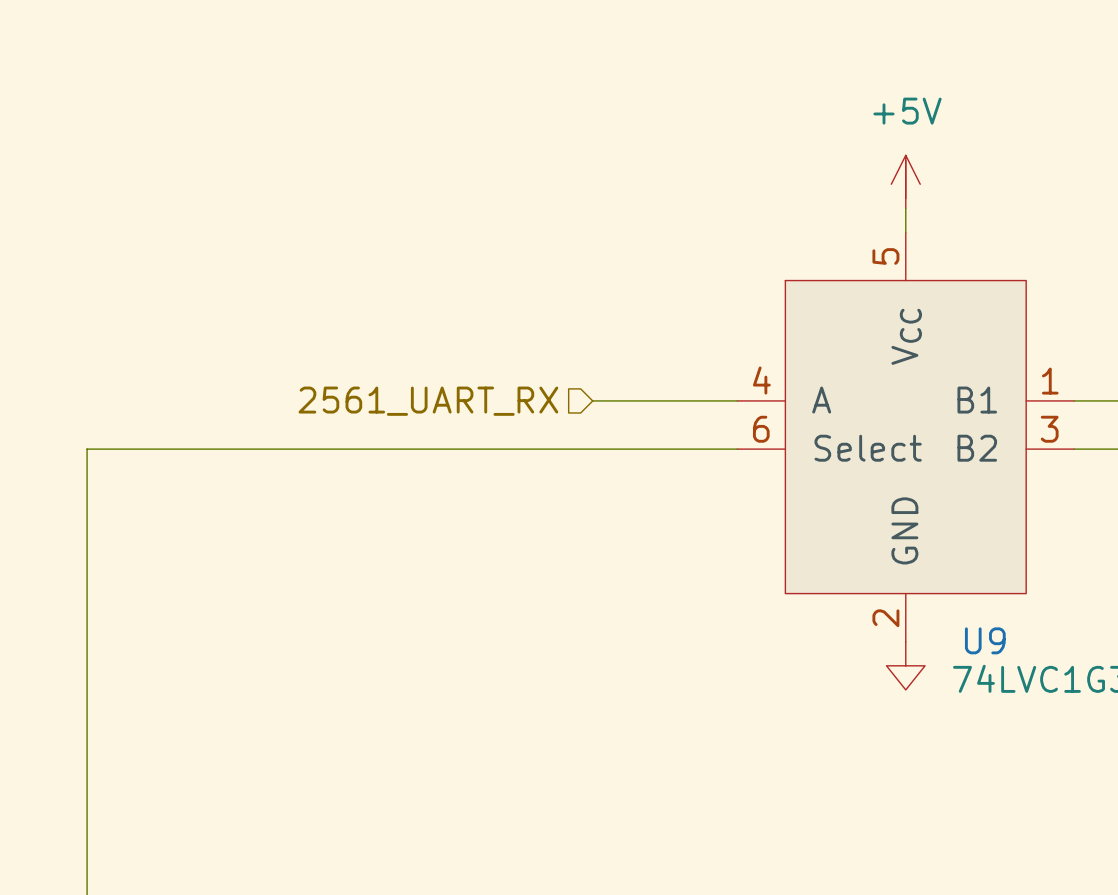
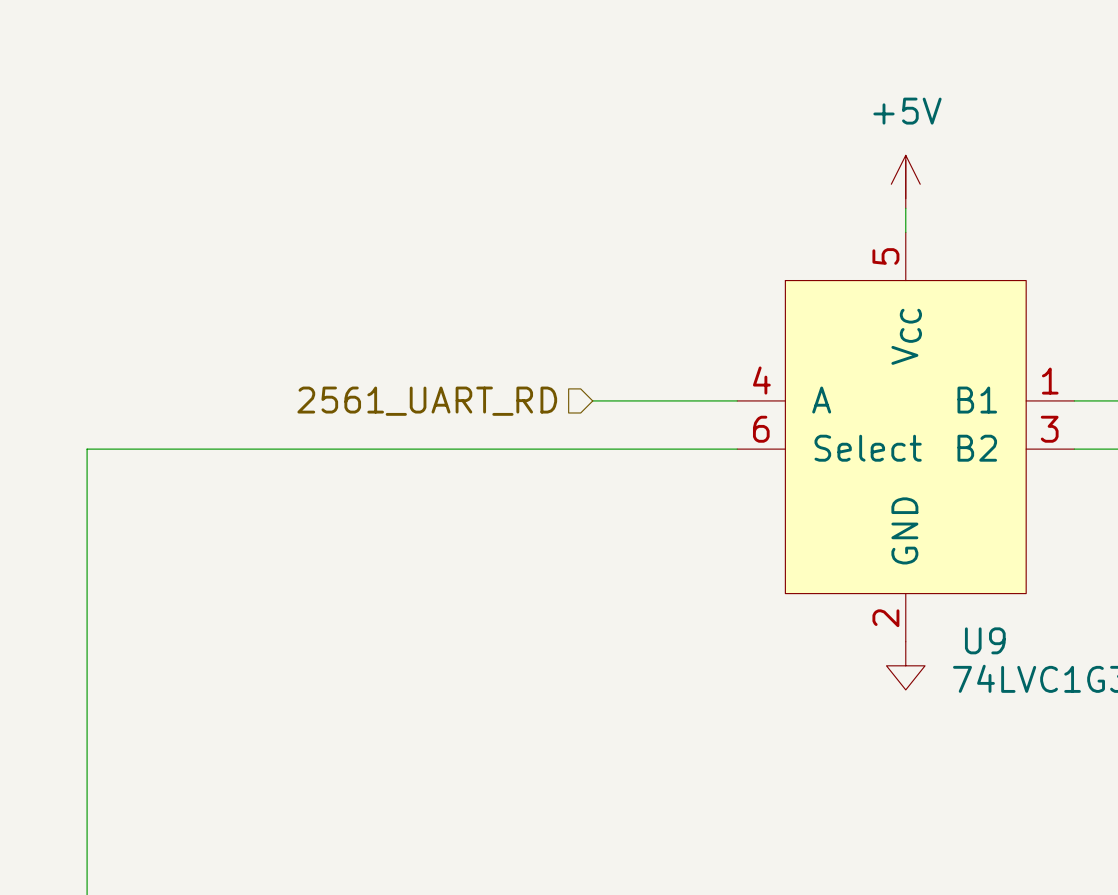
hierarchical label: 2561_UART_RX (428, 401) -> 2561_UART_RD (427, 401)

